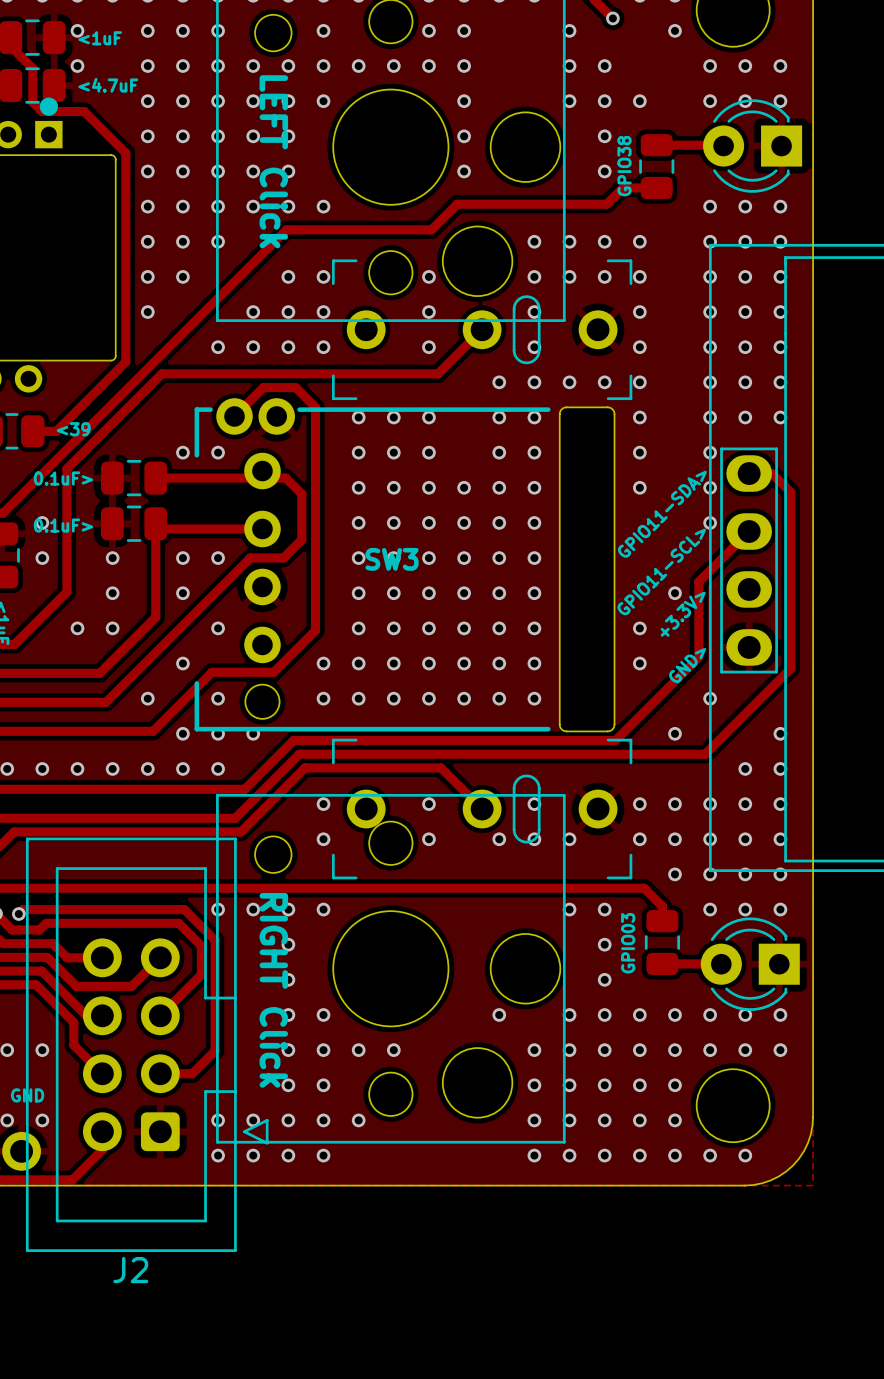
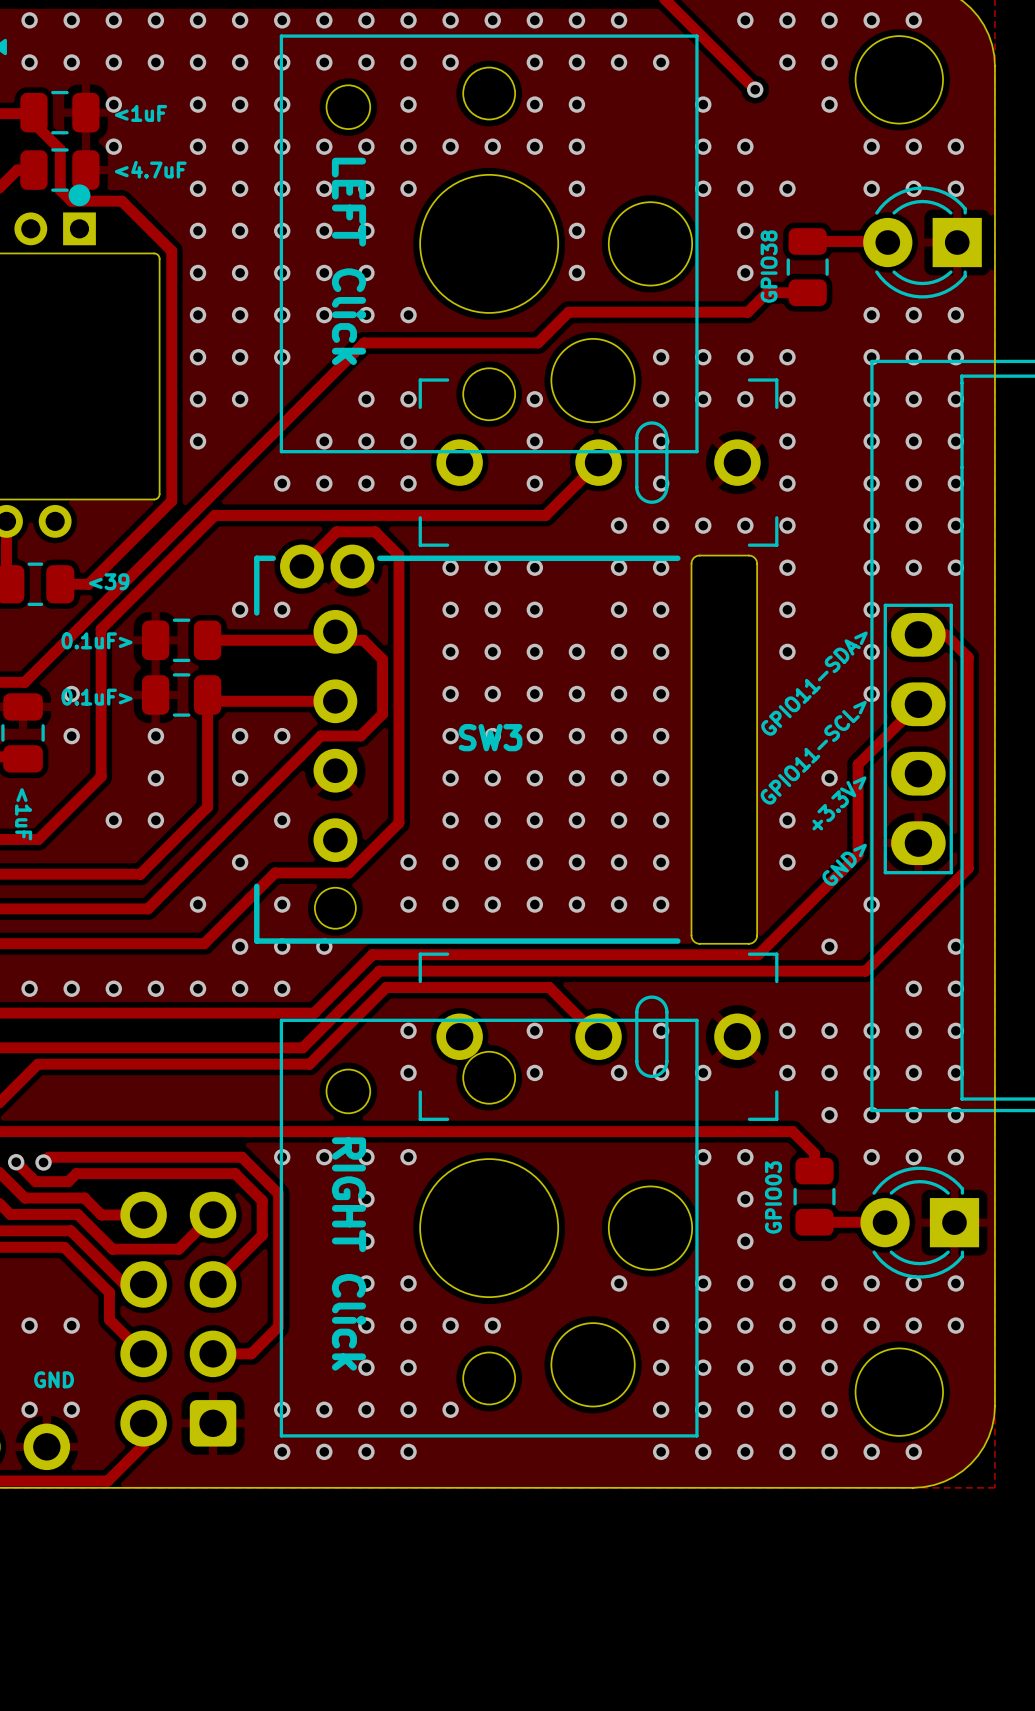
J2: (147, 1044) -> none

